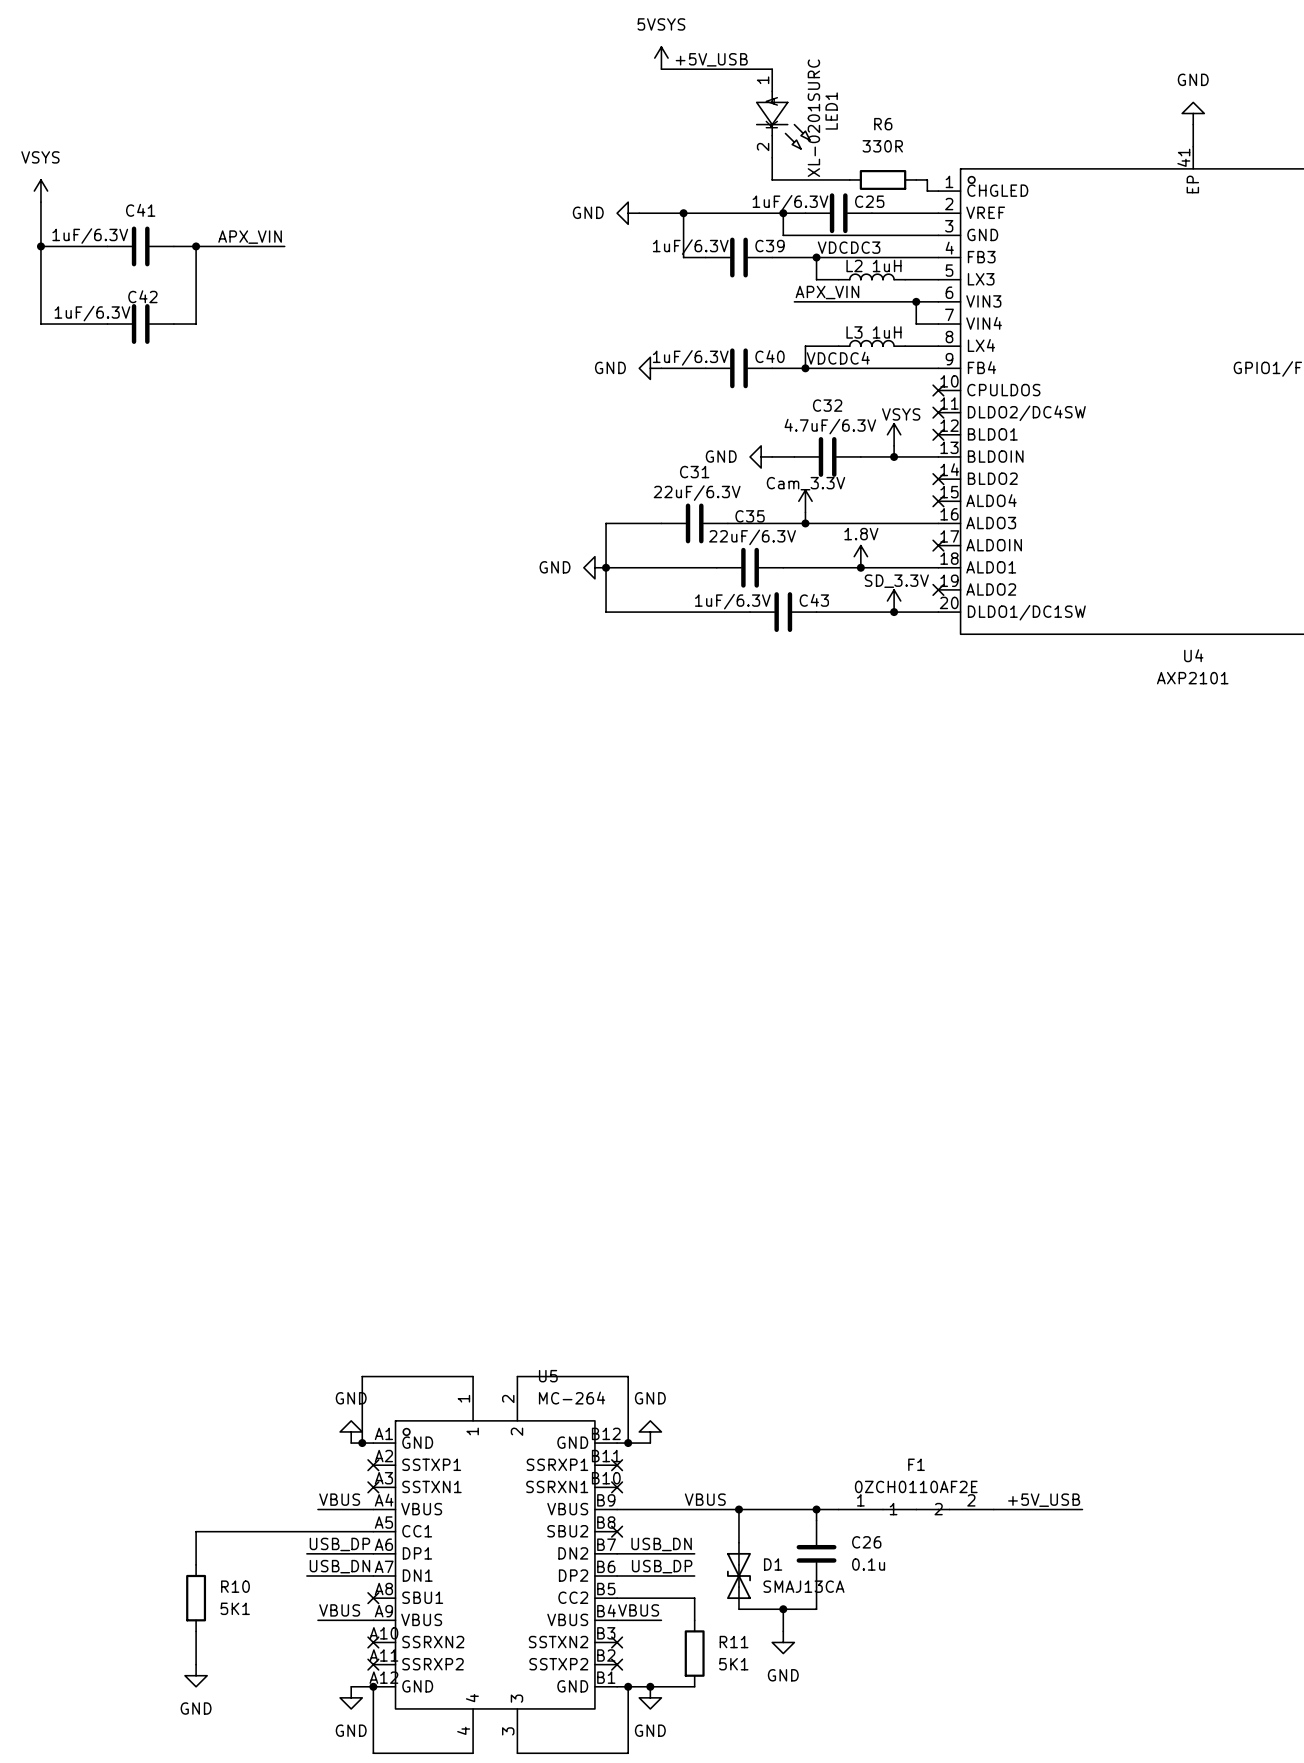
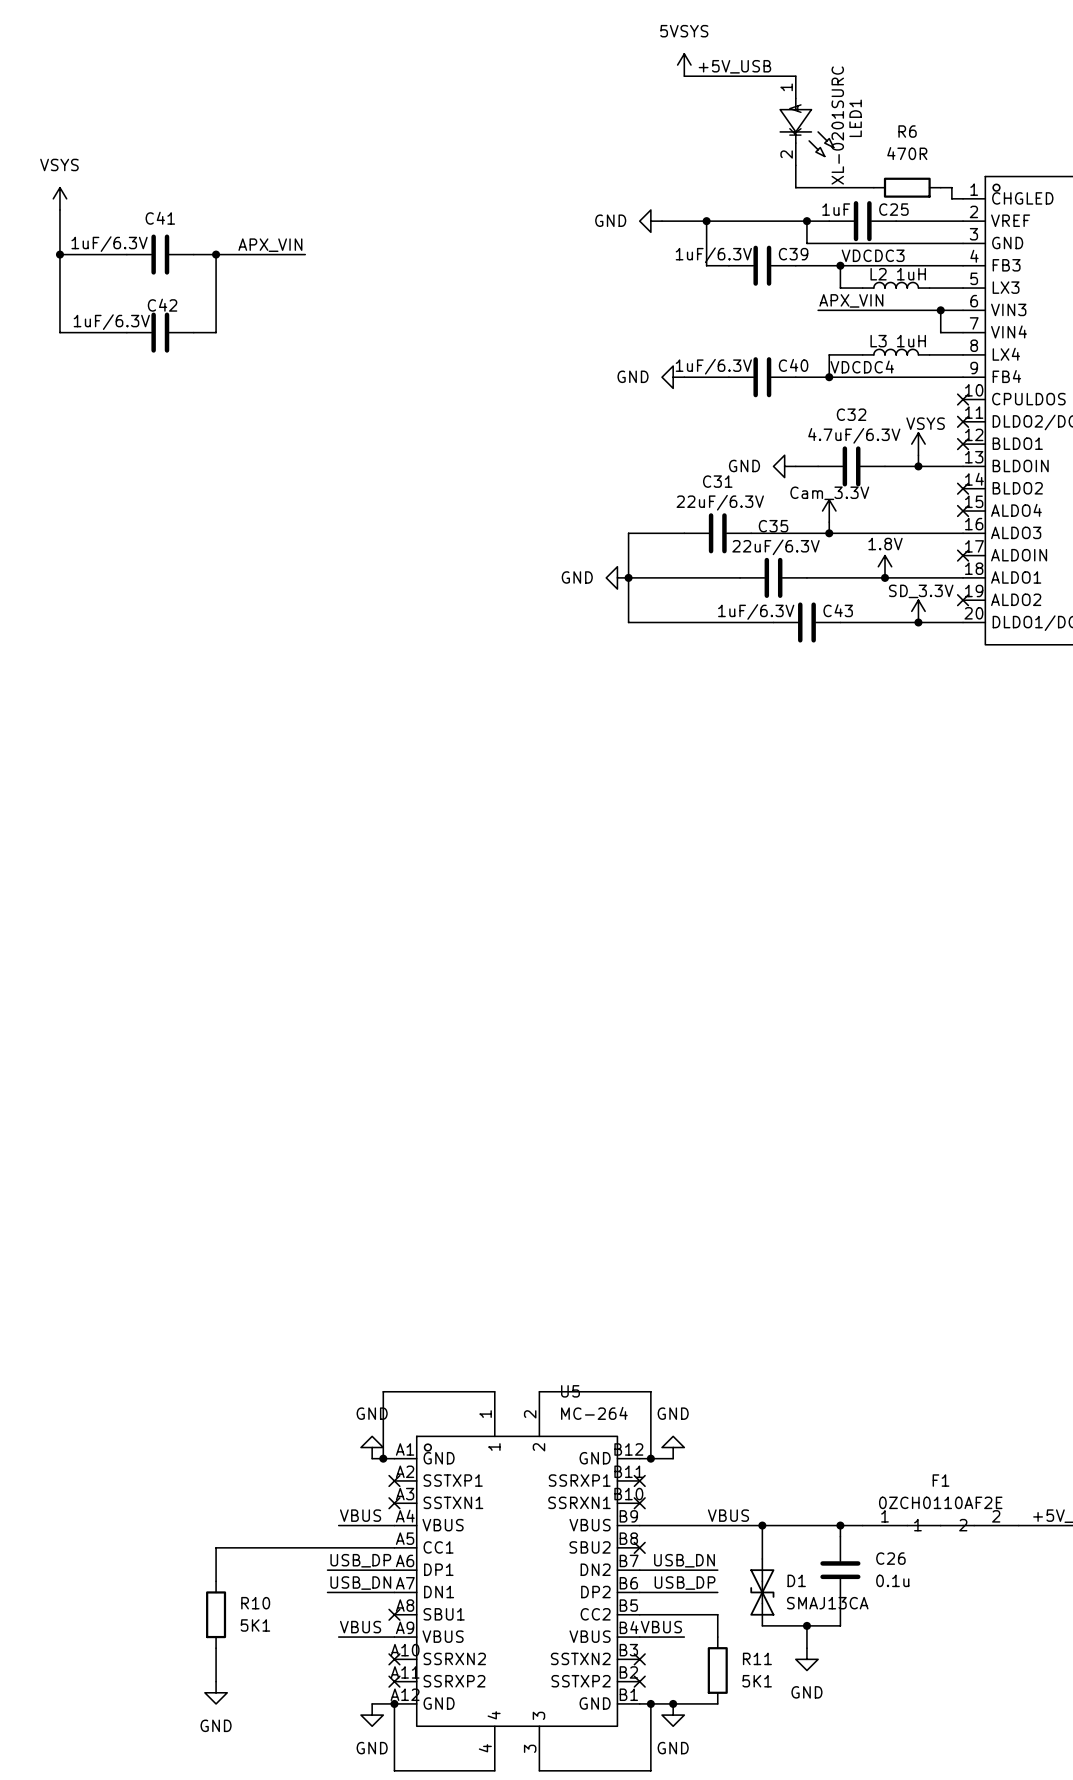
R6 value: 330R (882, 146) -> 470R (907, 153)
C25 value: 1uF/6.3V (790, 202) -> 1uF (836, 209)

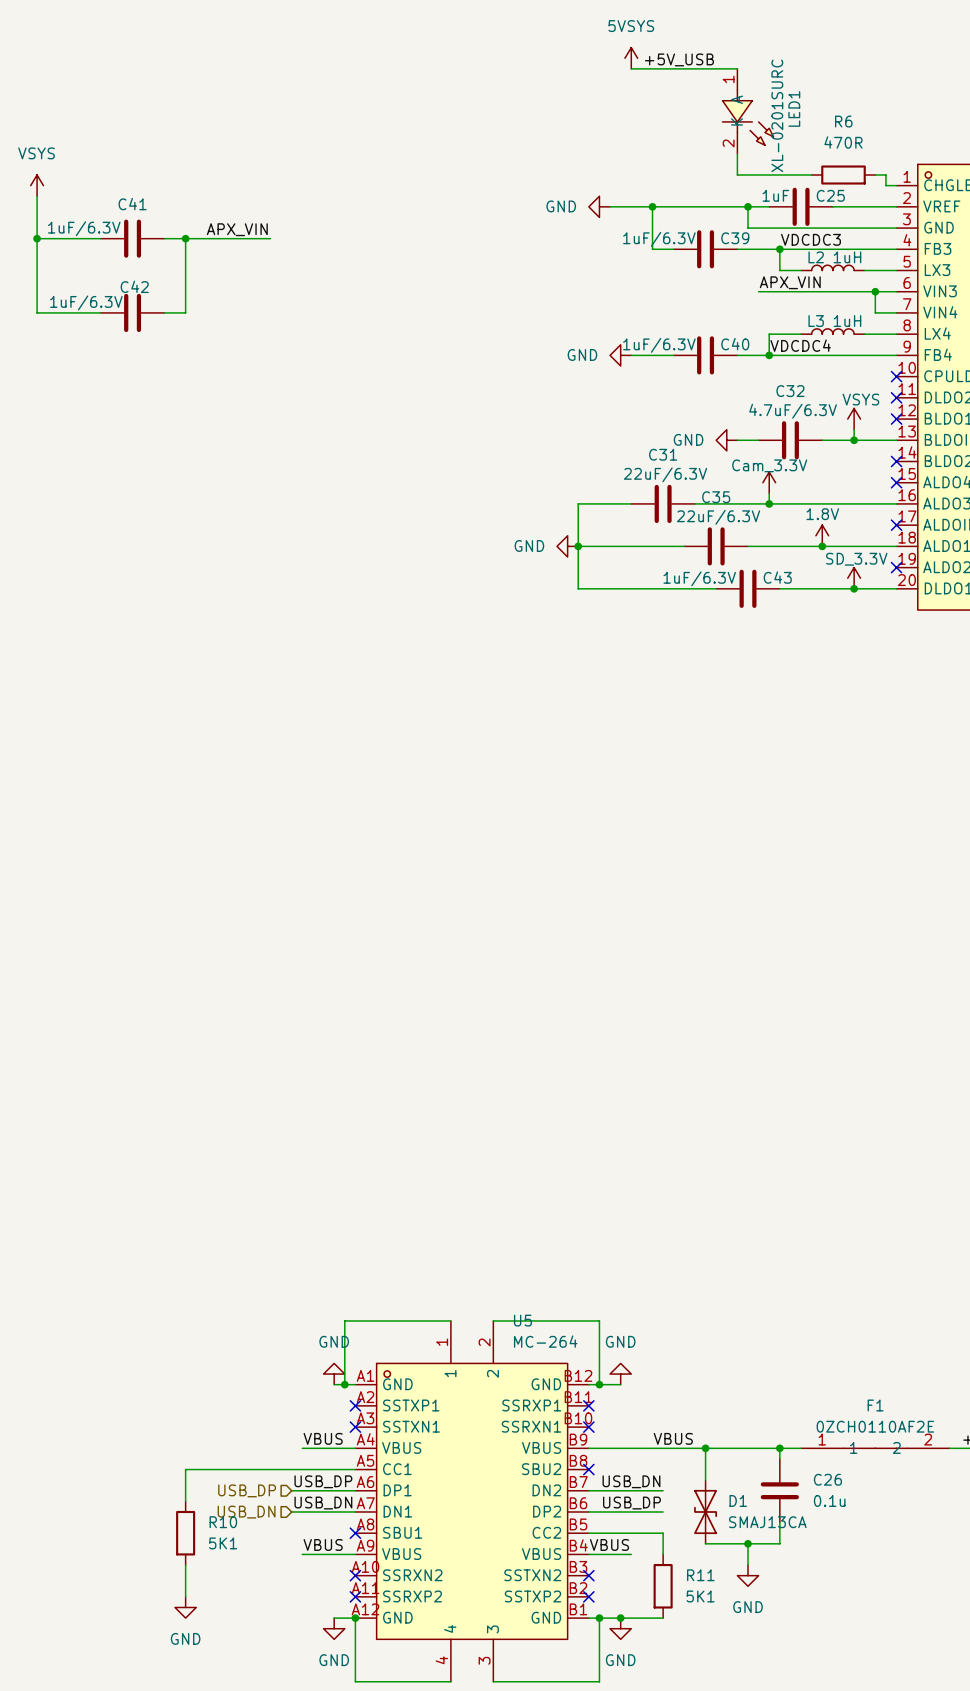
hierarchical label: none -> USB_DP (247, 1490)
hierarchical label: none -> USB_DN (246, 1512)

